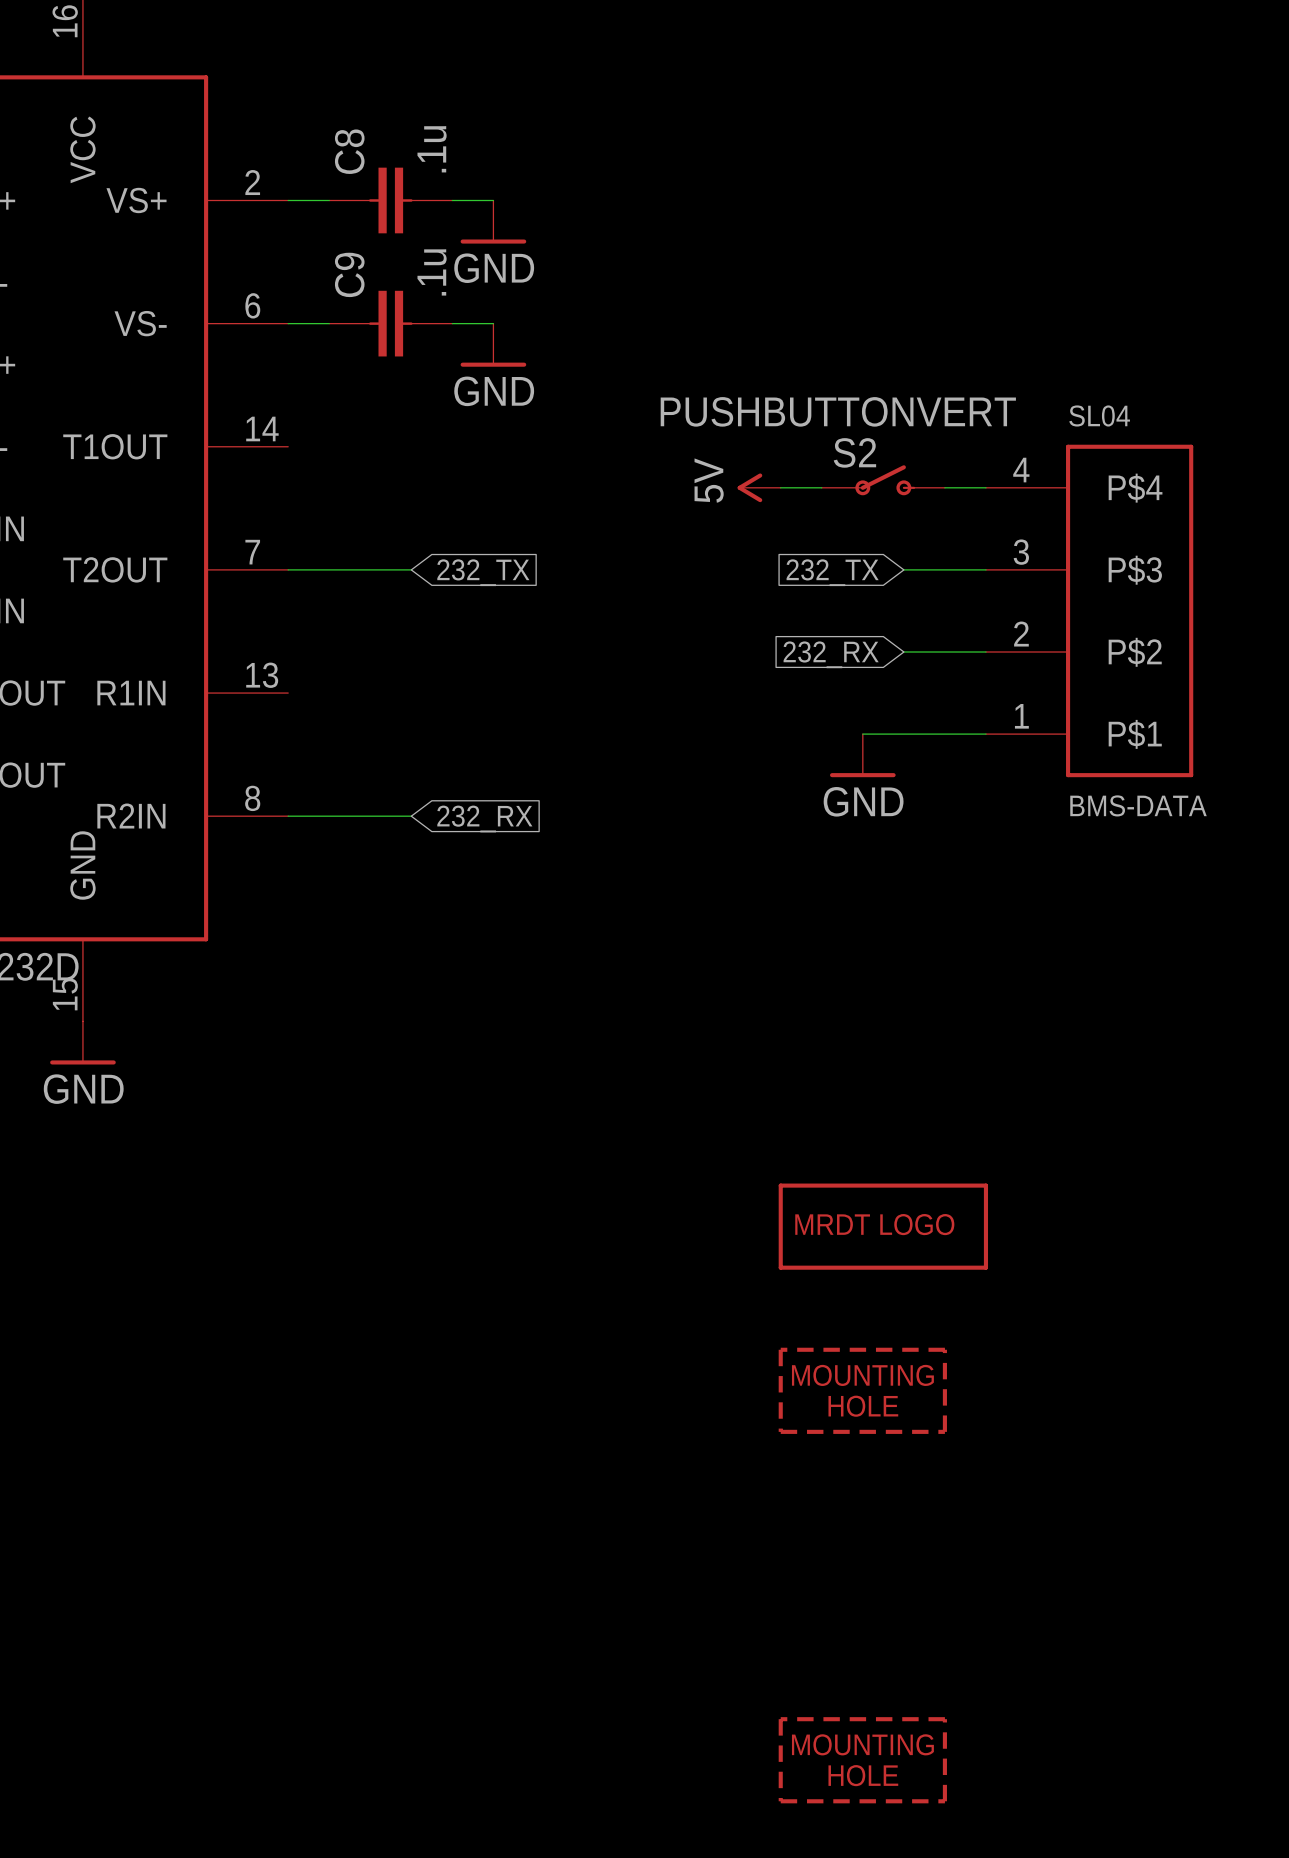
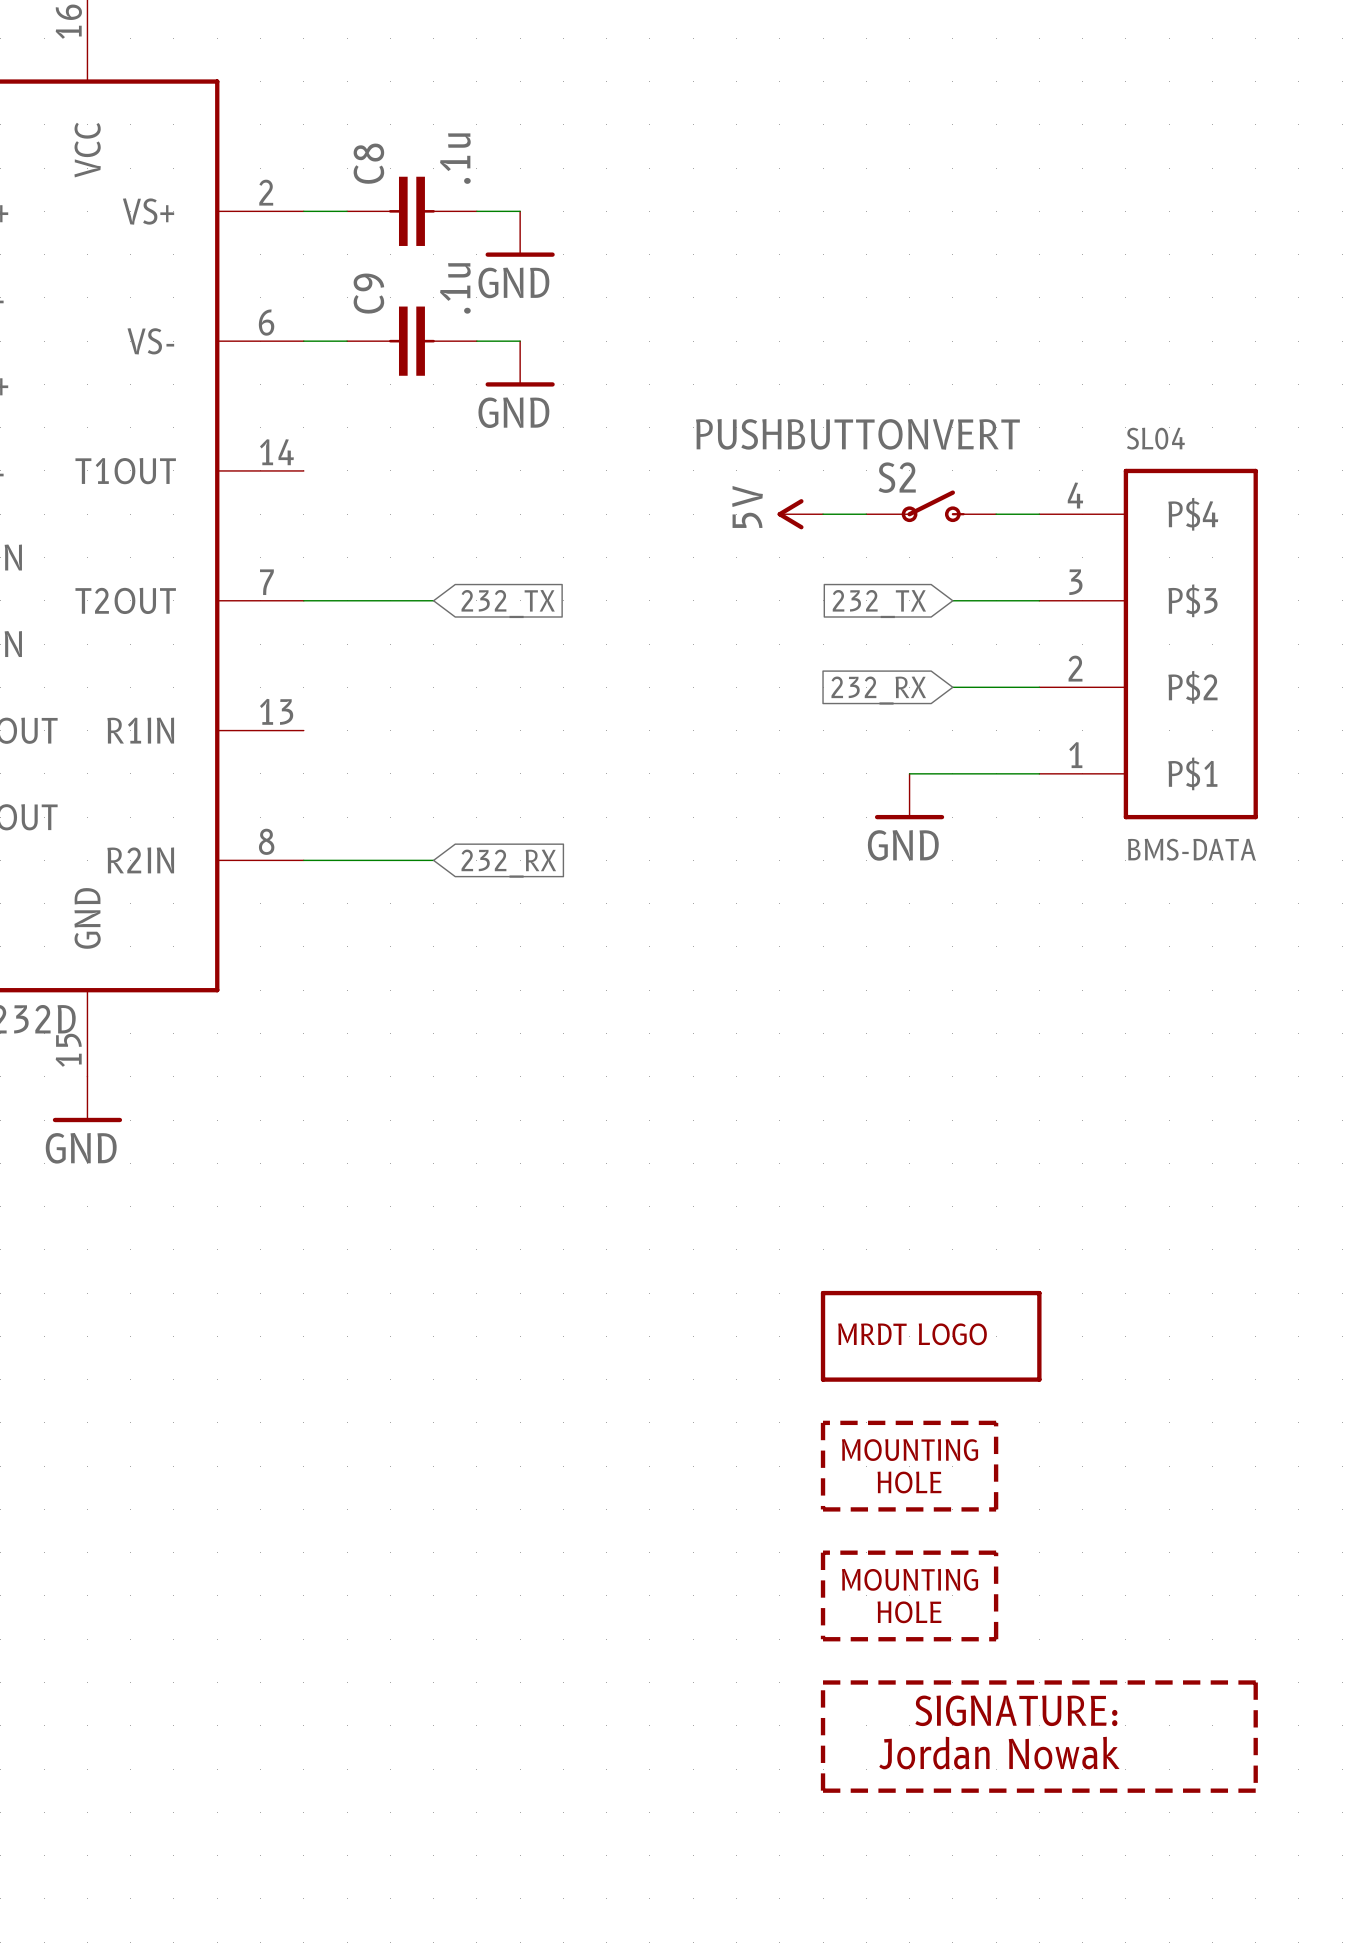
part position: (883, 1226) -> (931, 1336)
part: none -> (1039, 1736)
part position: (862, 1760) -> (909, 1595)

